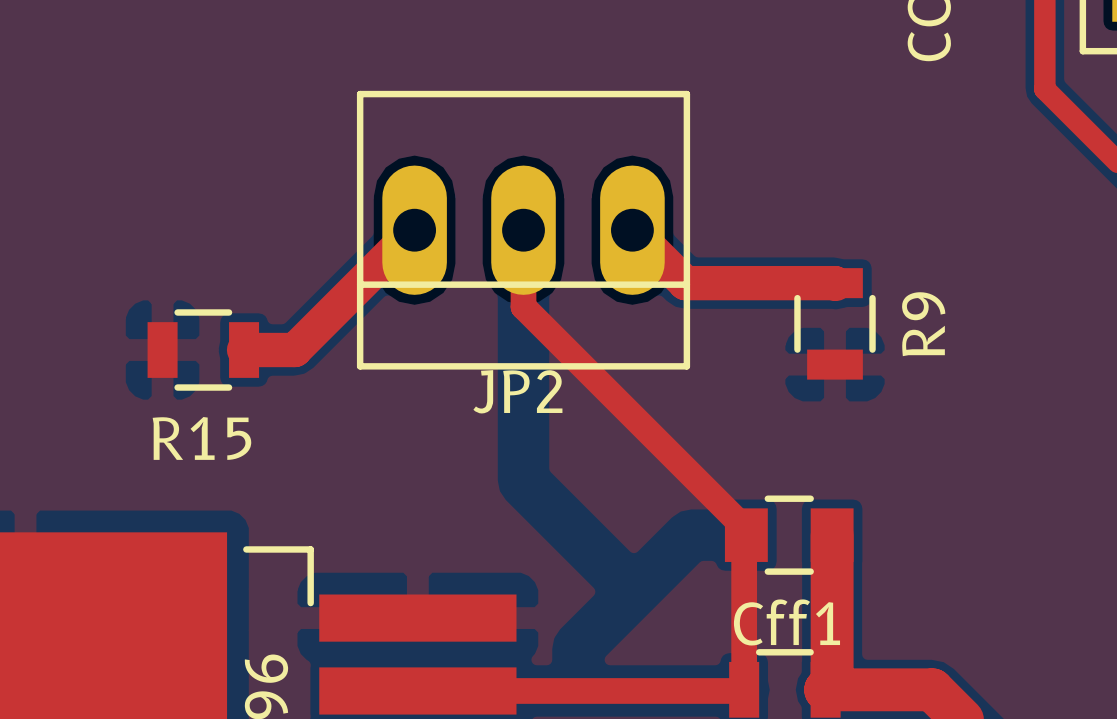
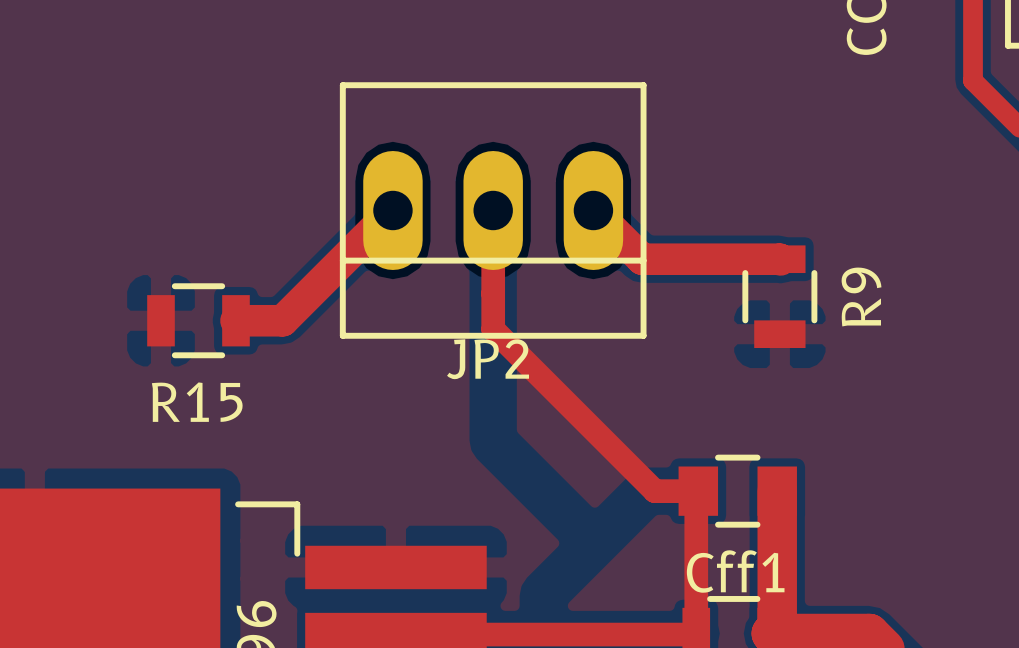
top track: (523, 306) (746, 529) (746, 535) -> (493, 281) (493, 329) (654, 491) (698, 491)

